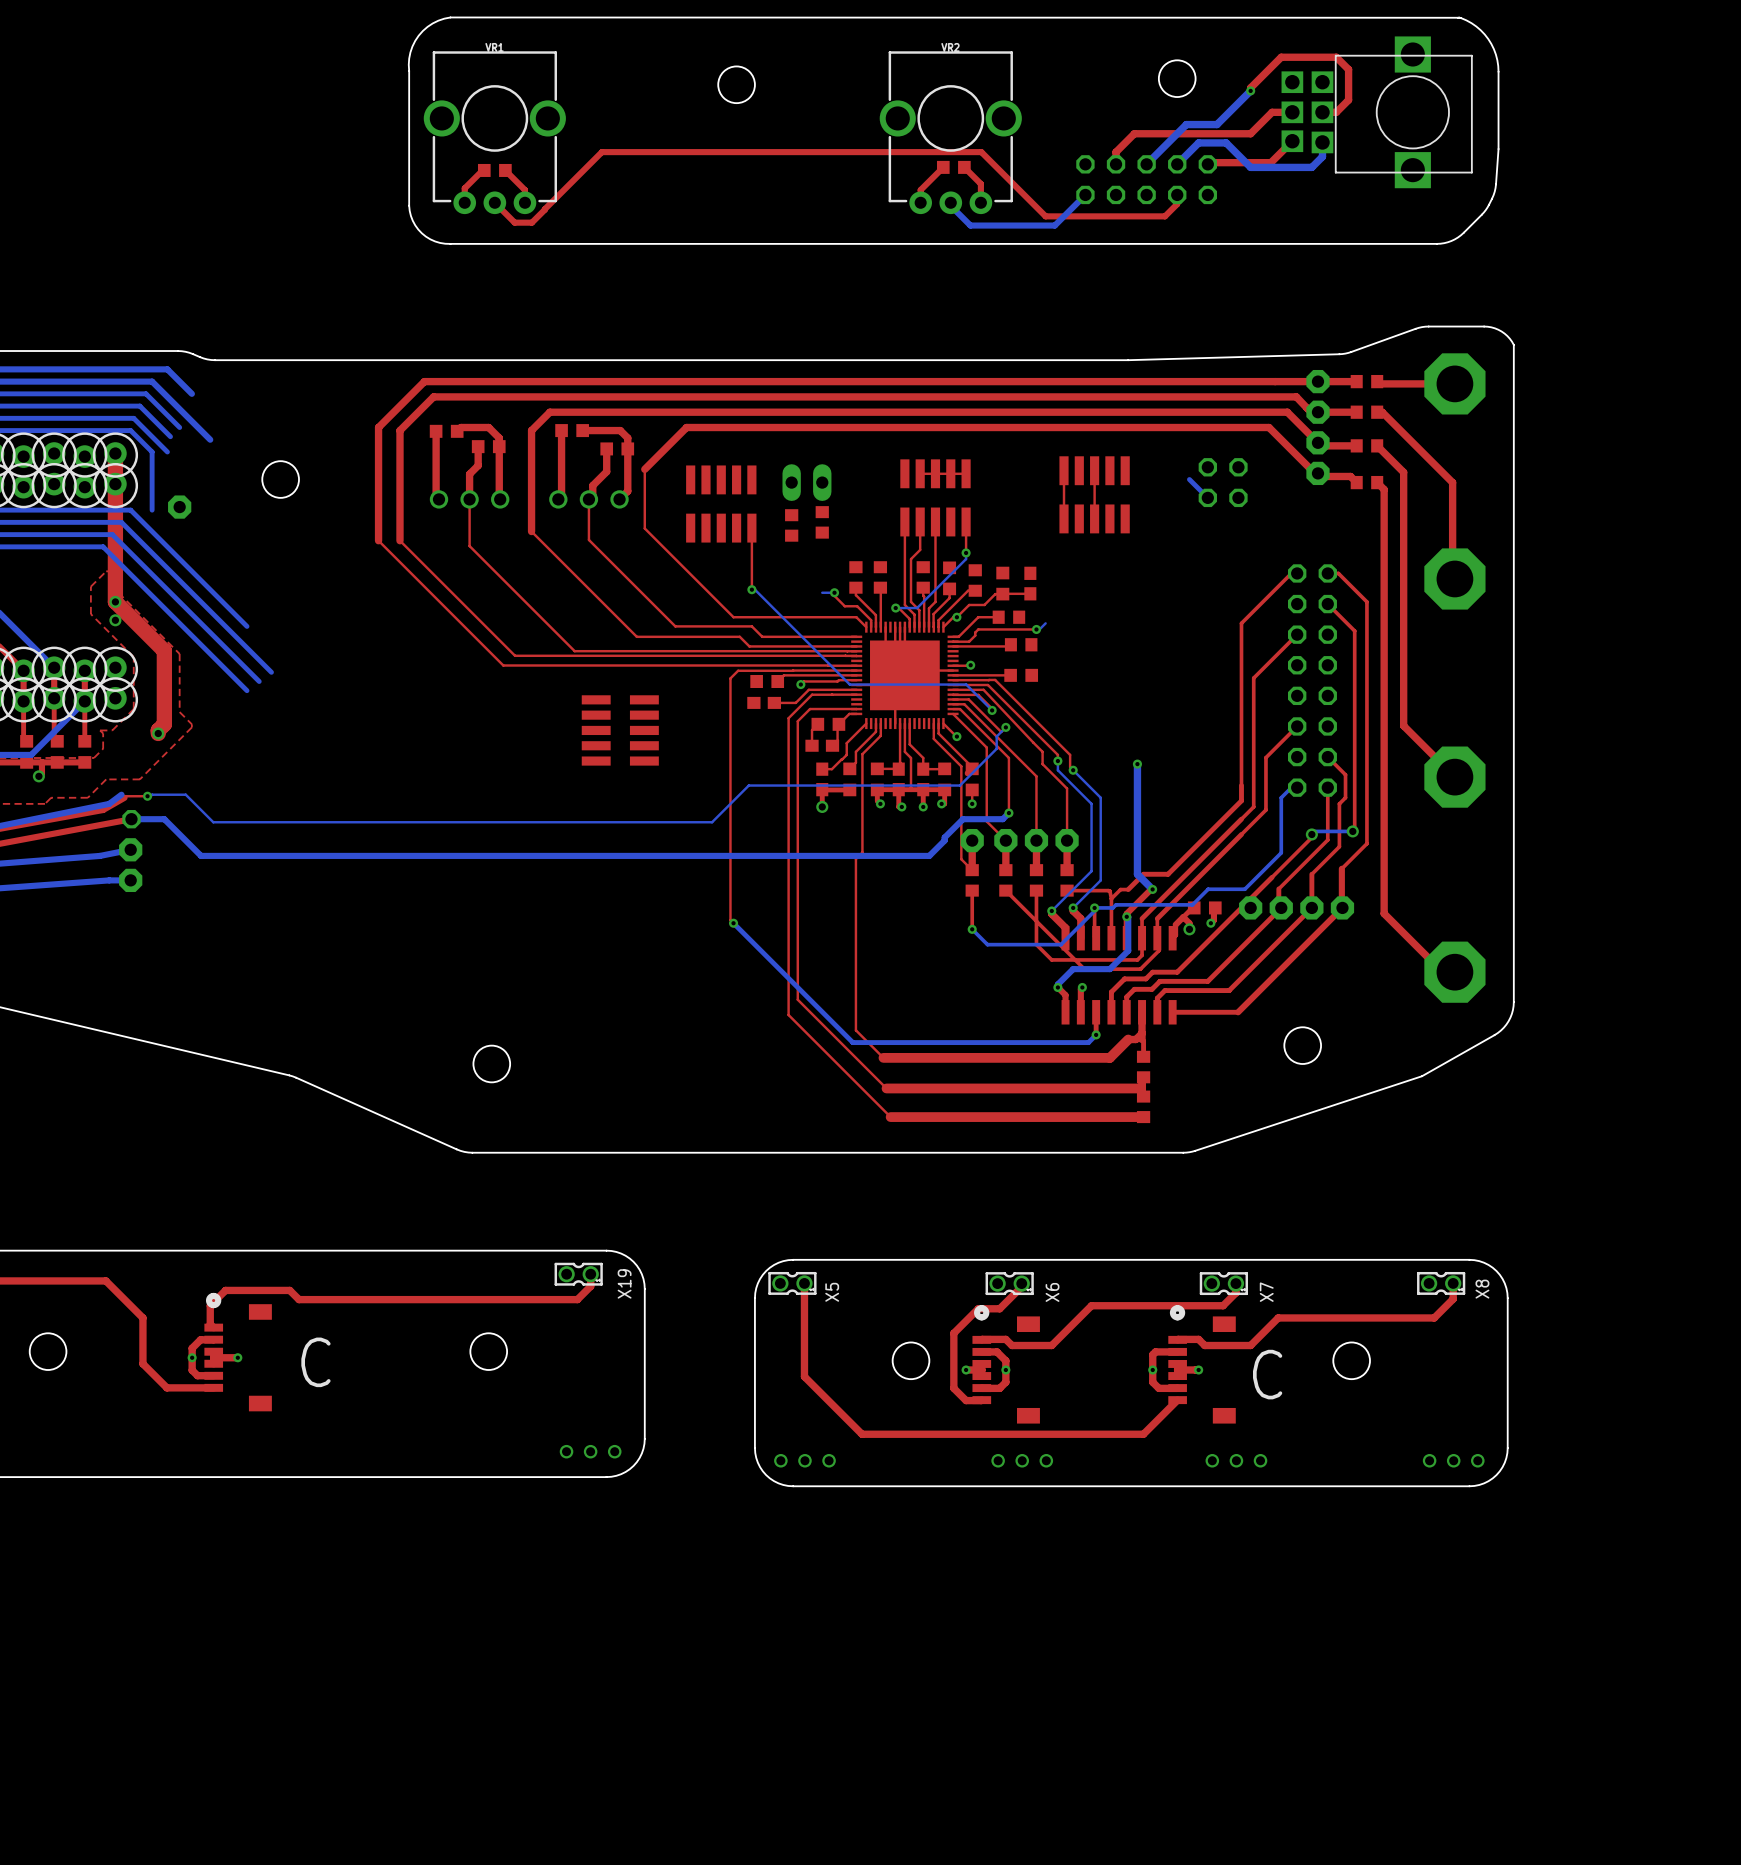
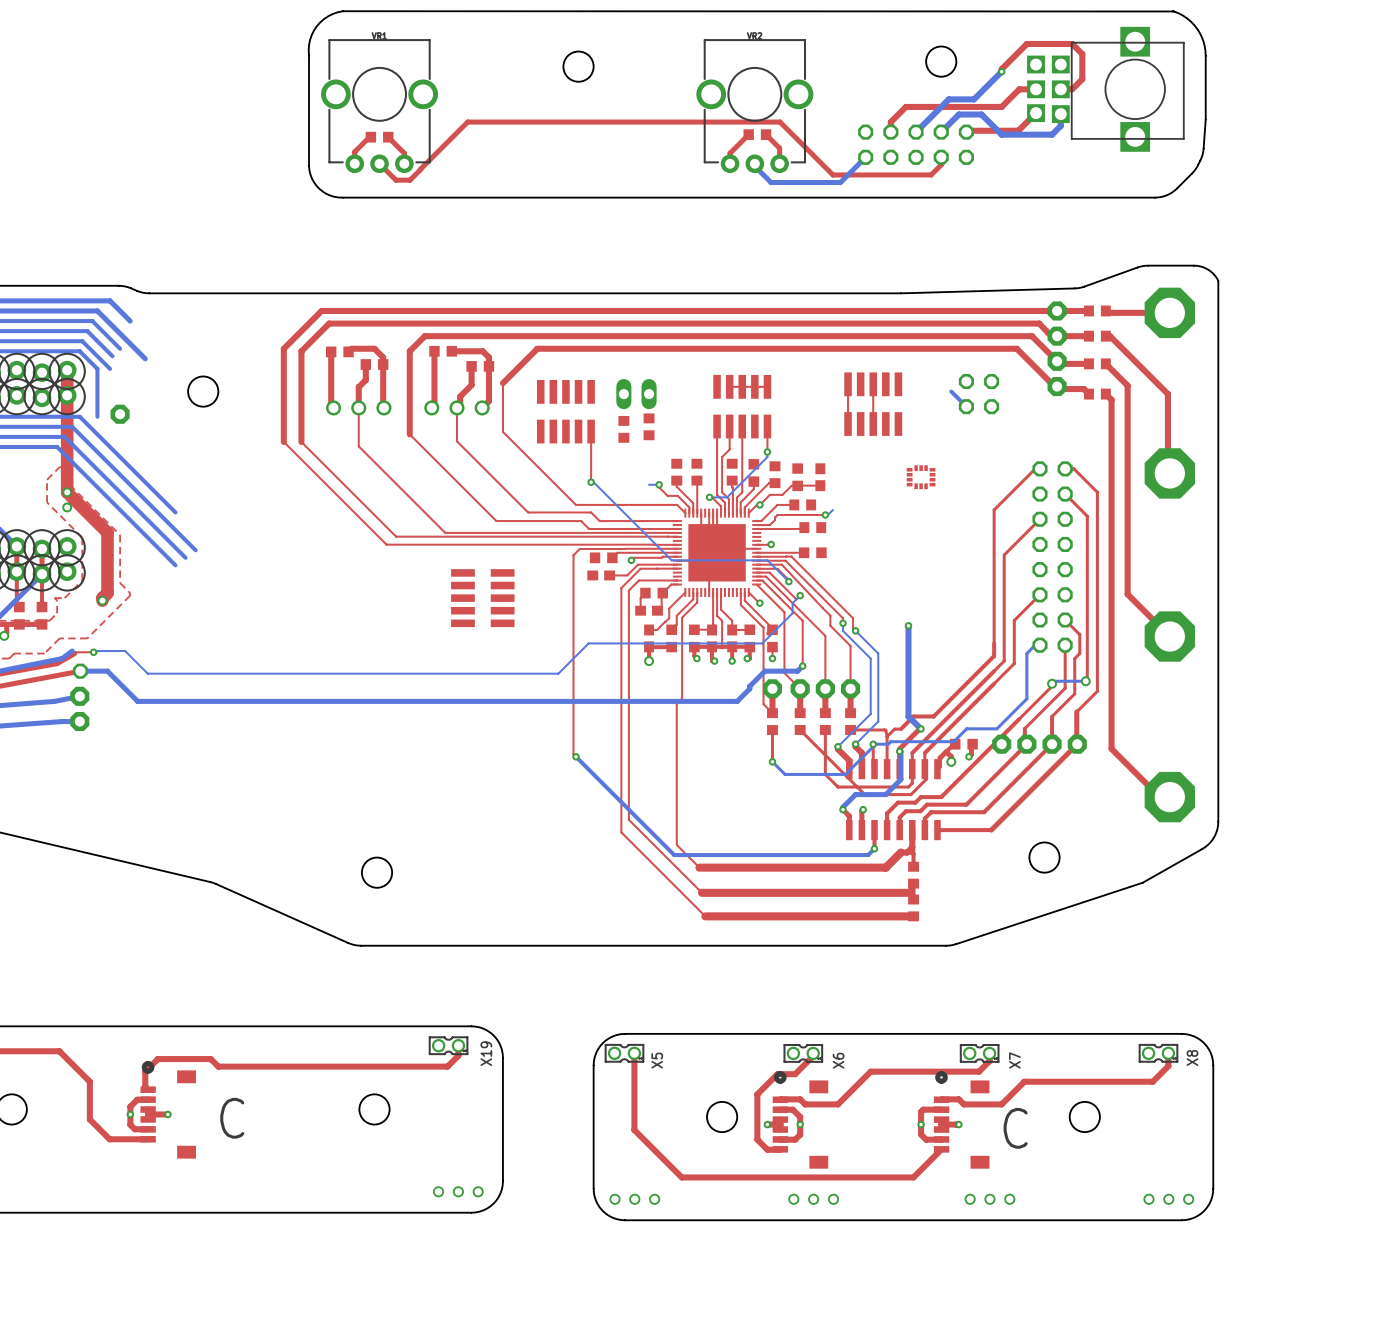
part: none -> (921, 477)

